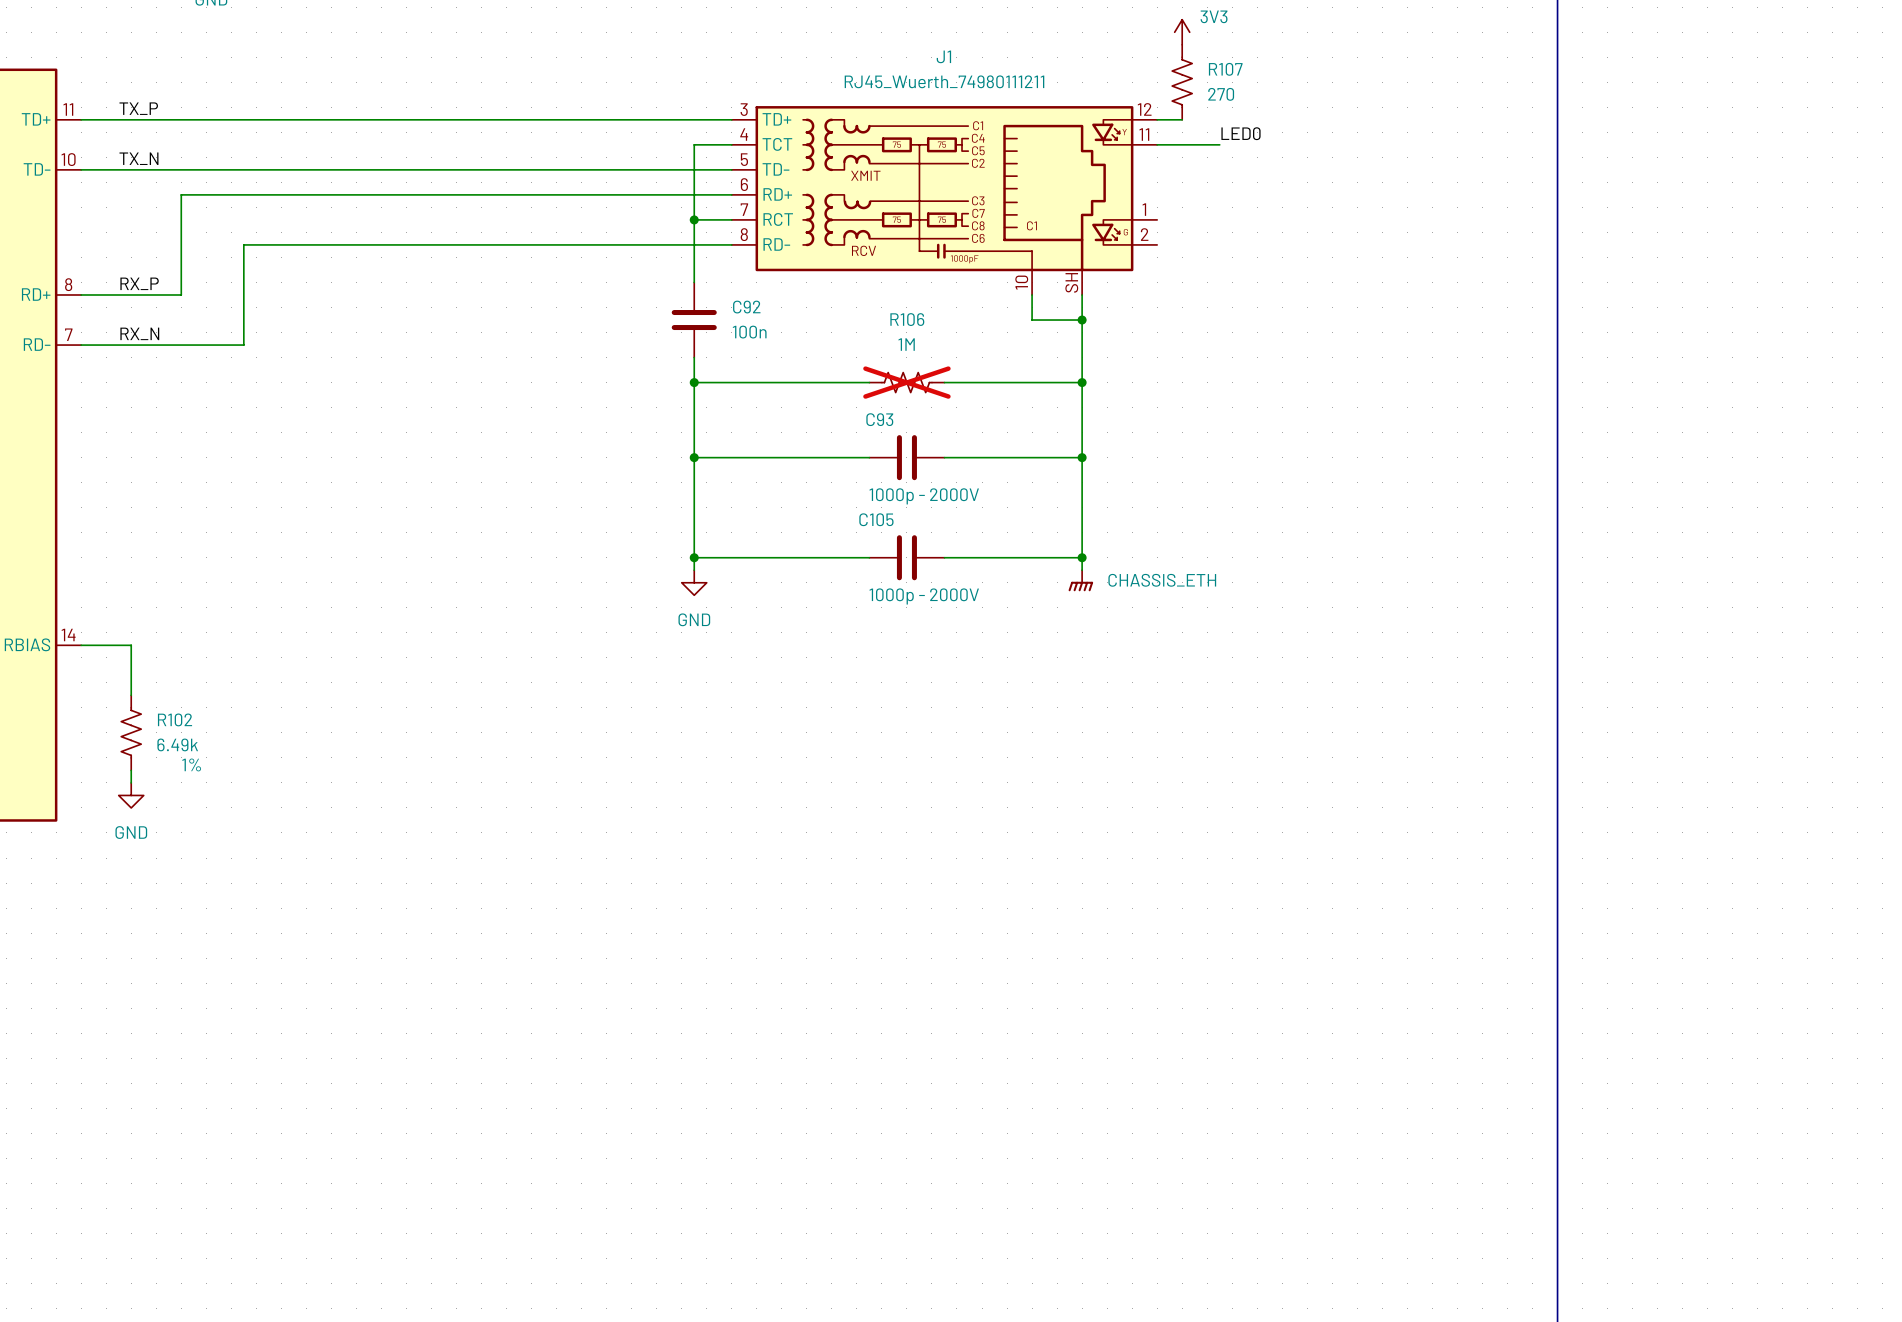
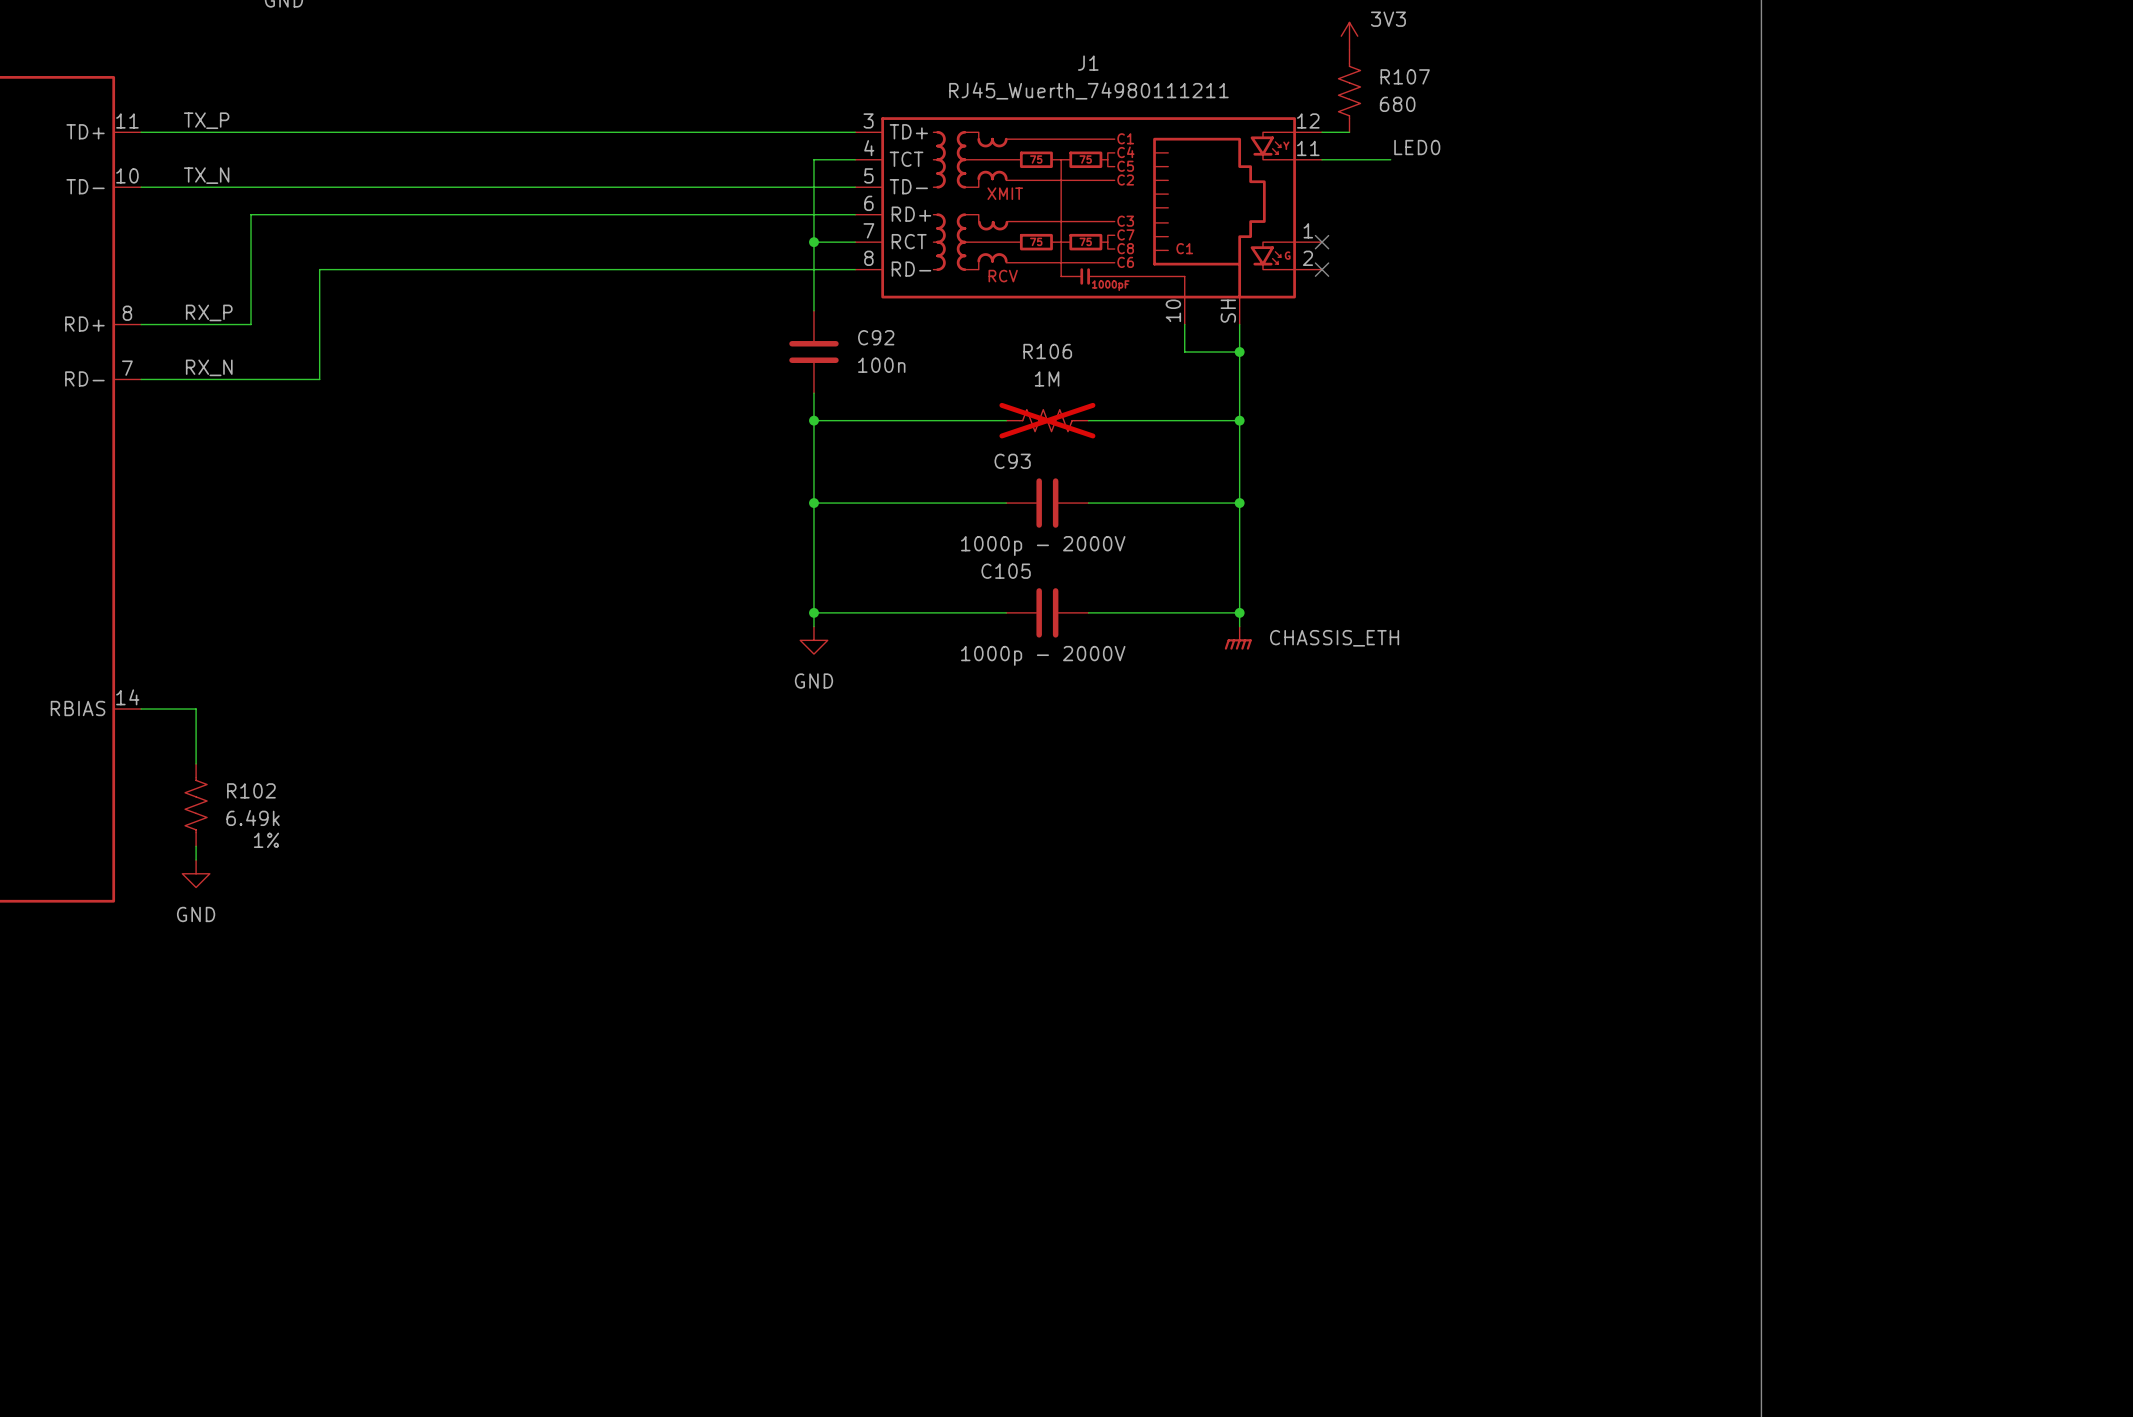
R107 value: 270 (1221, 94) -> 680 (1397, 104)
no-connect mark: none -> (1322, 242)
no-connect mark: none -> (1322, 269)

